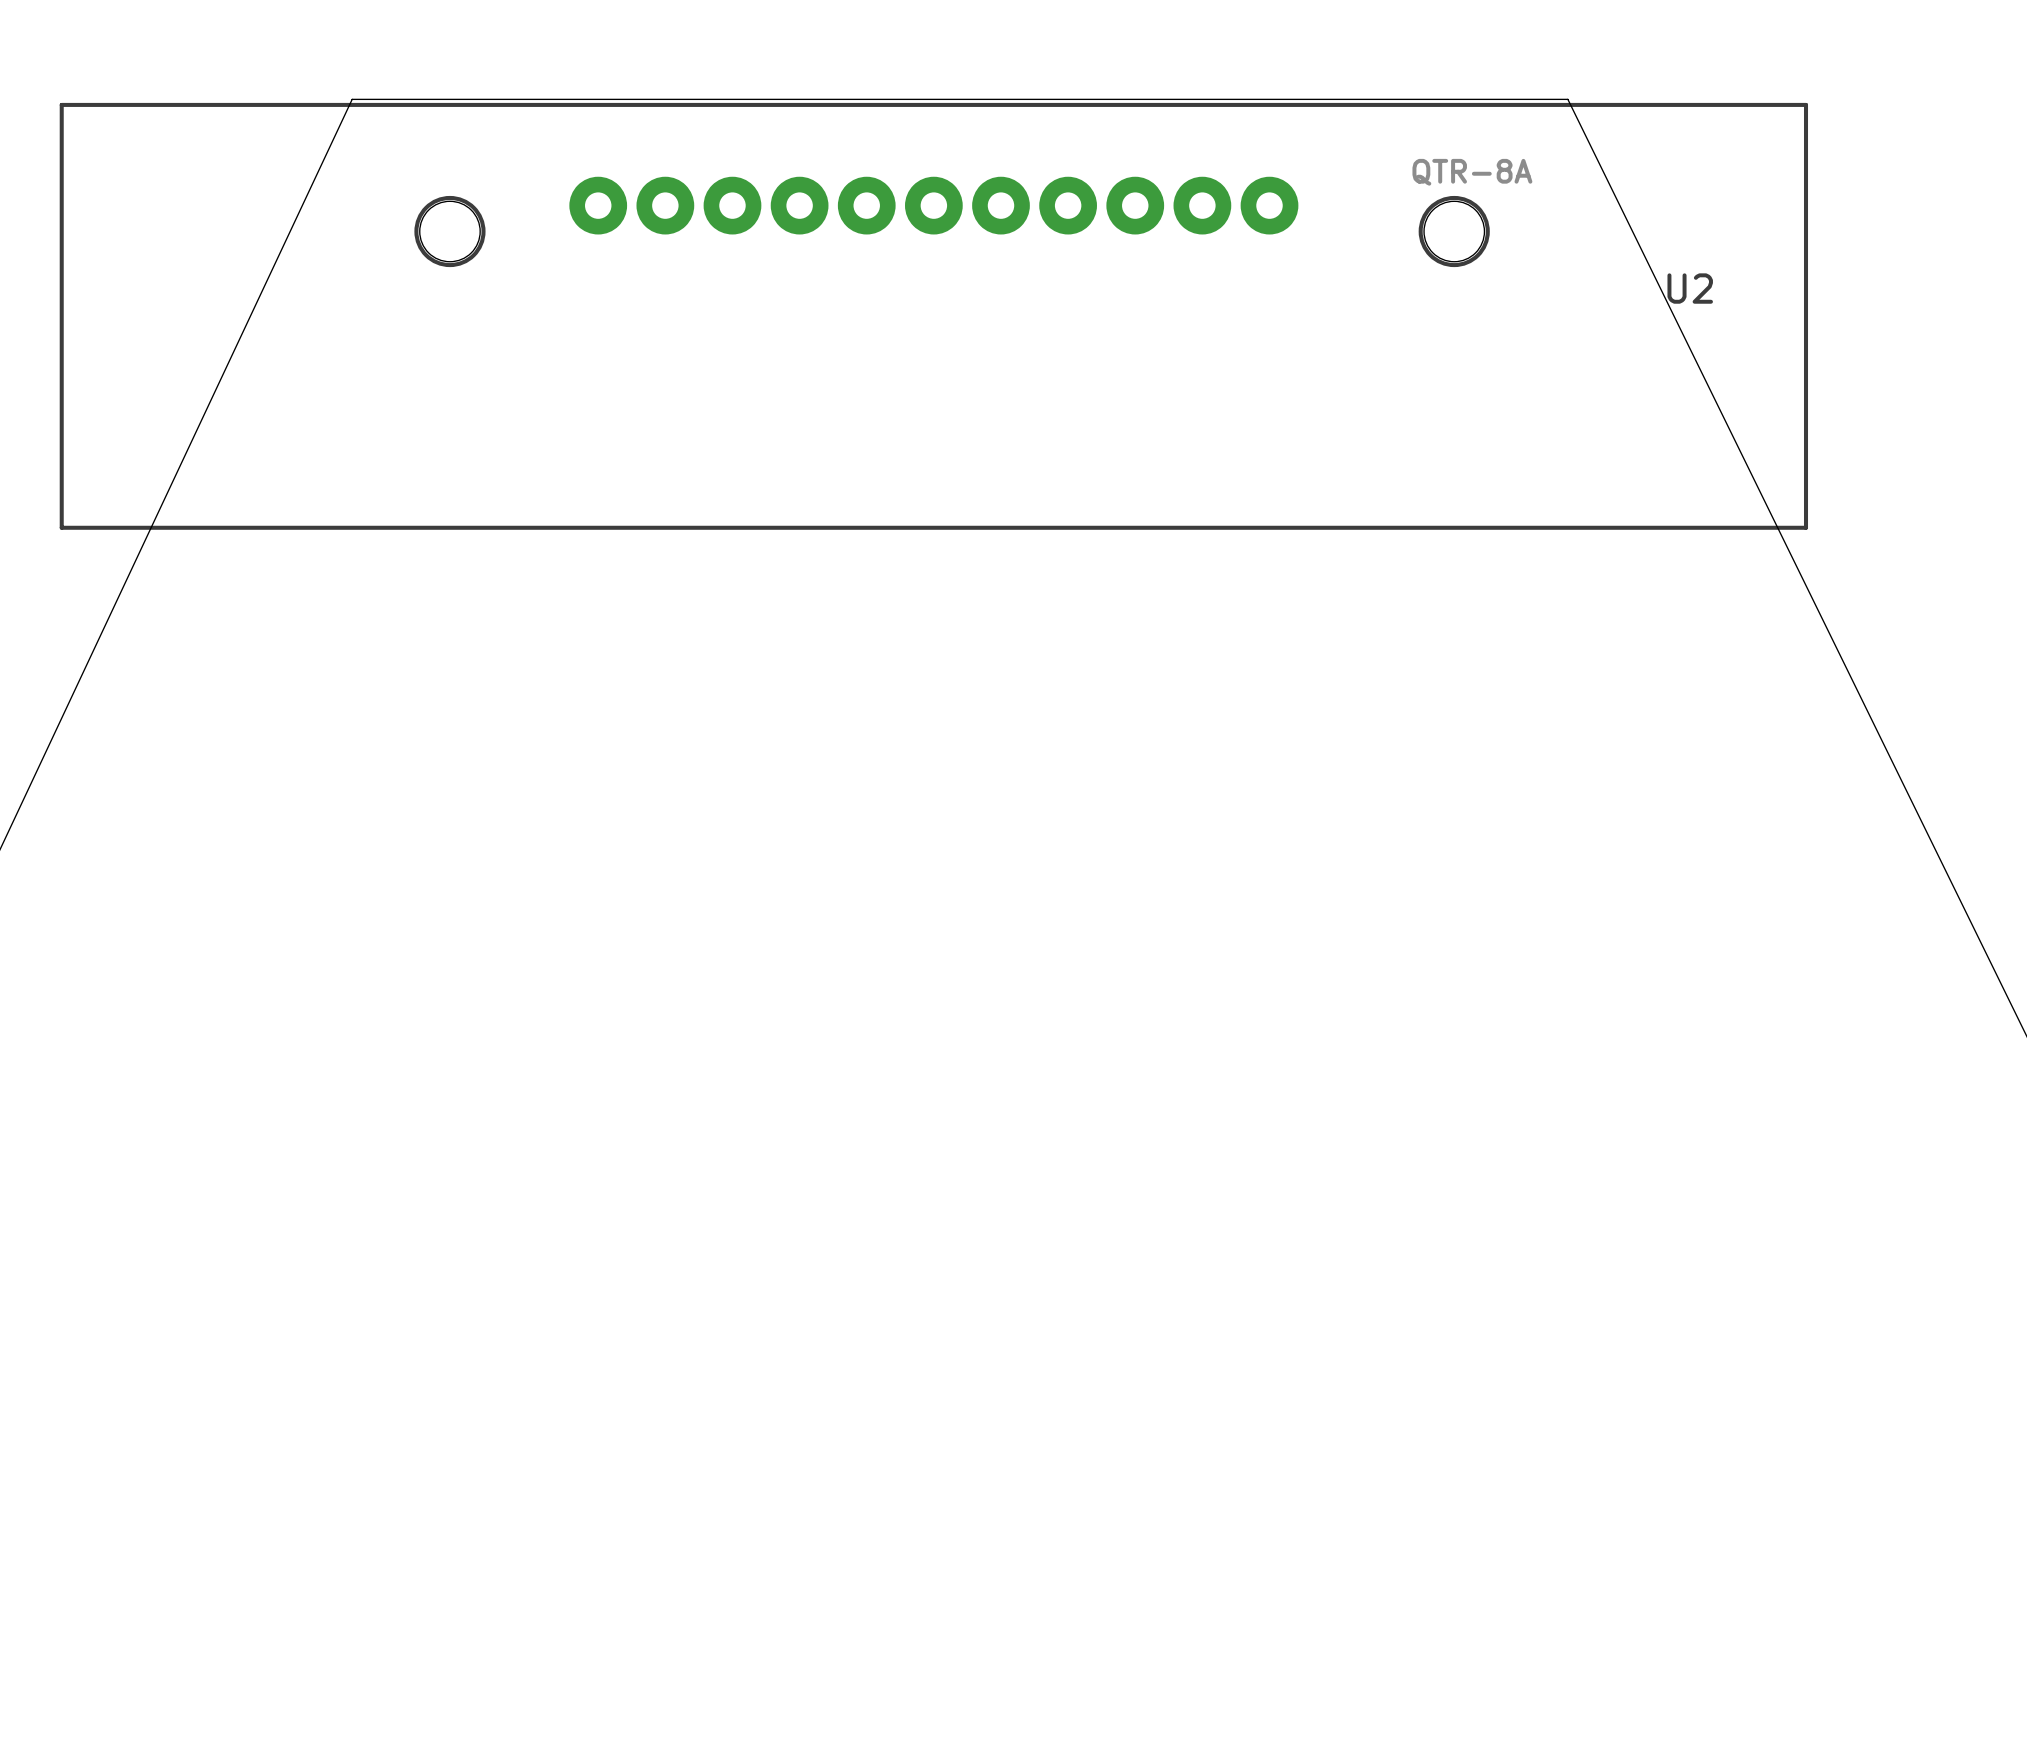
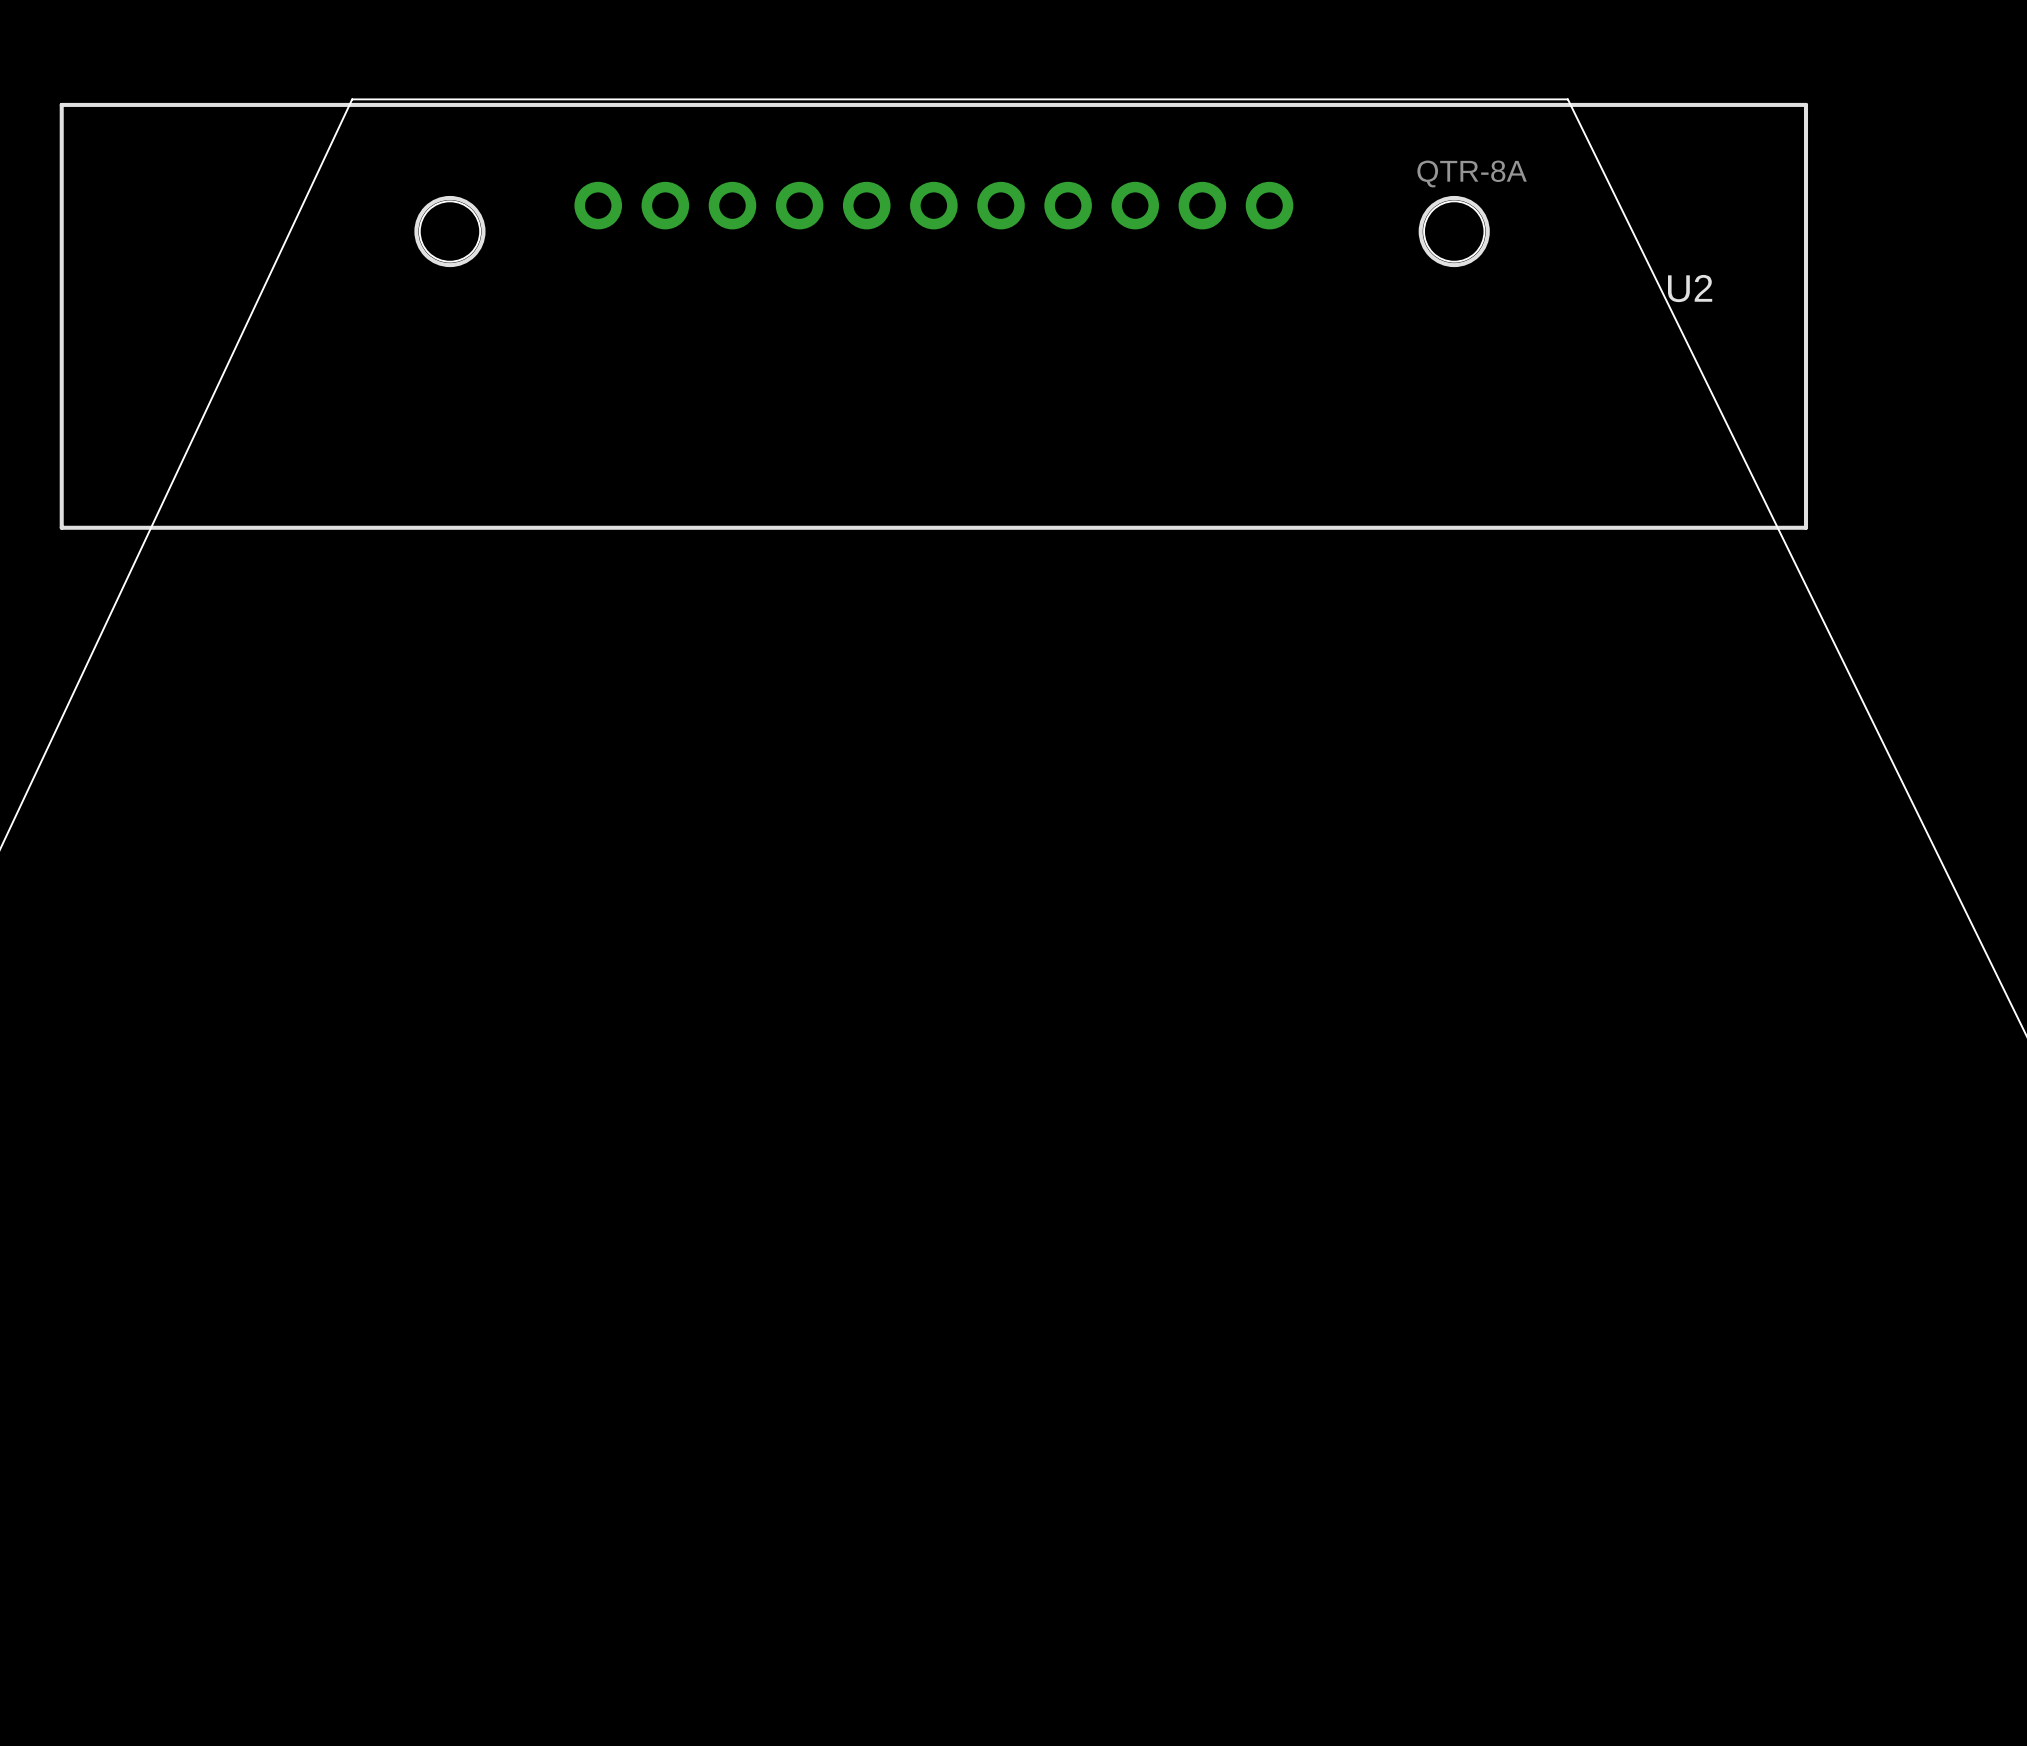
U2 footprint: [59, 102, 1809, 530] -> [59, 102, 1809, 530]

